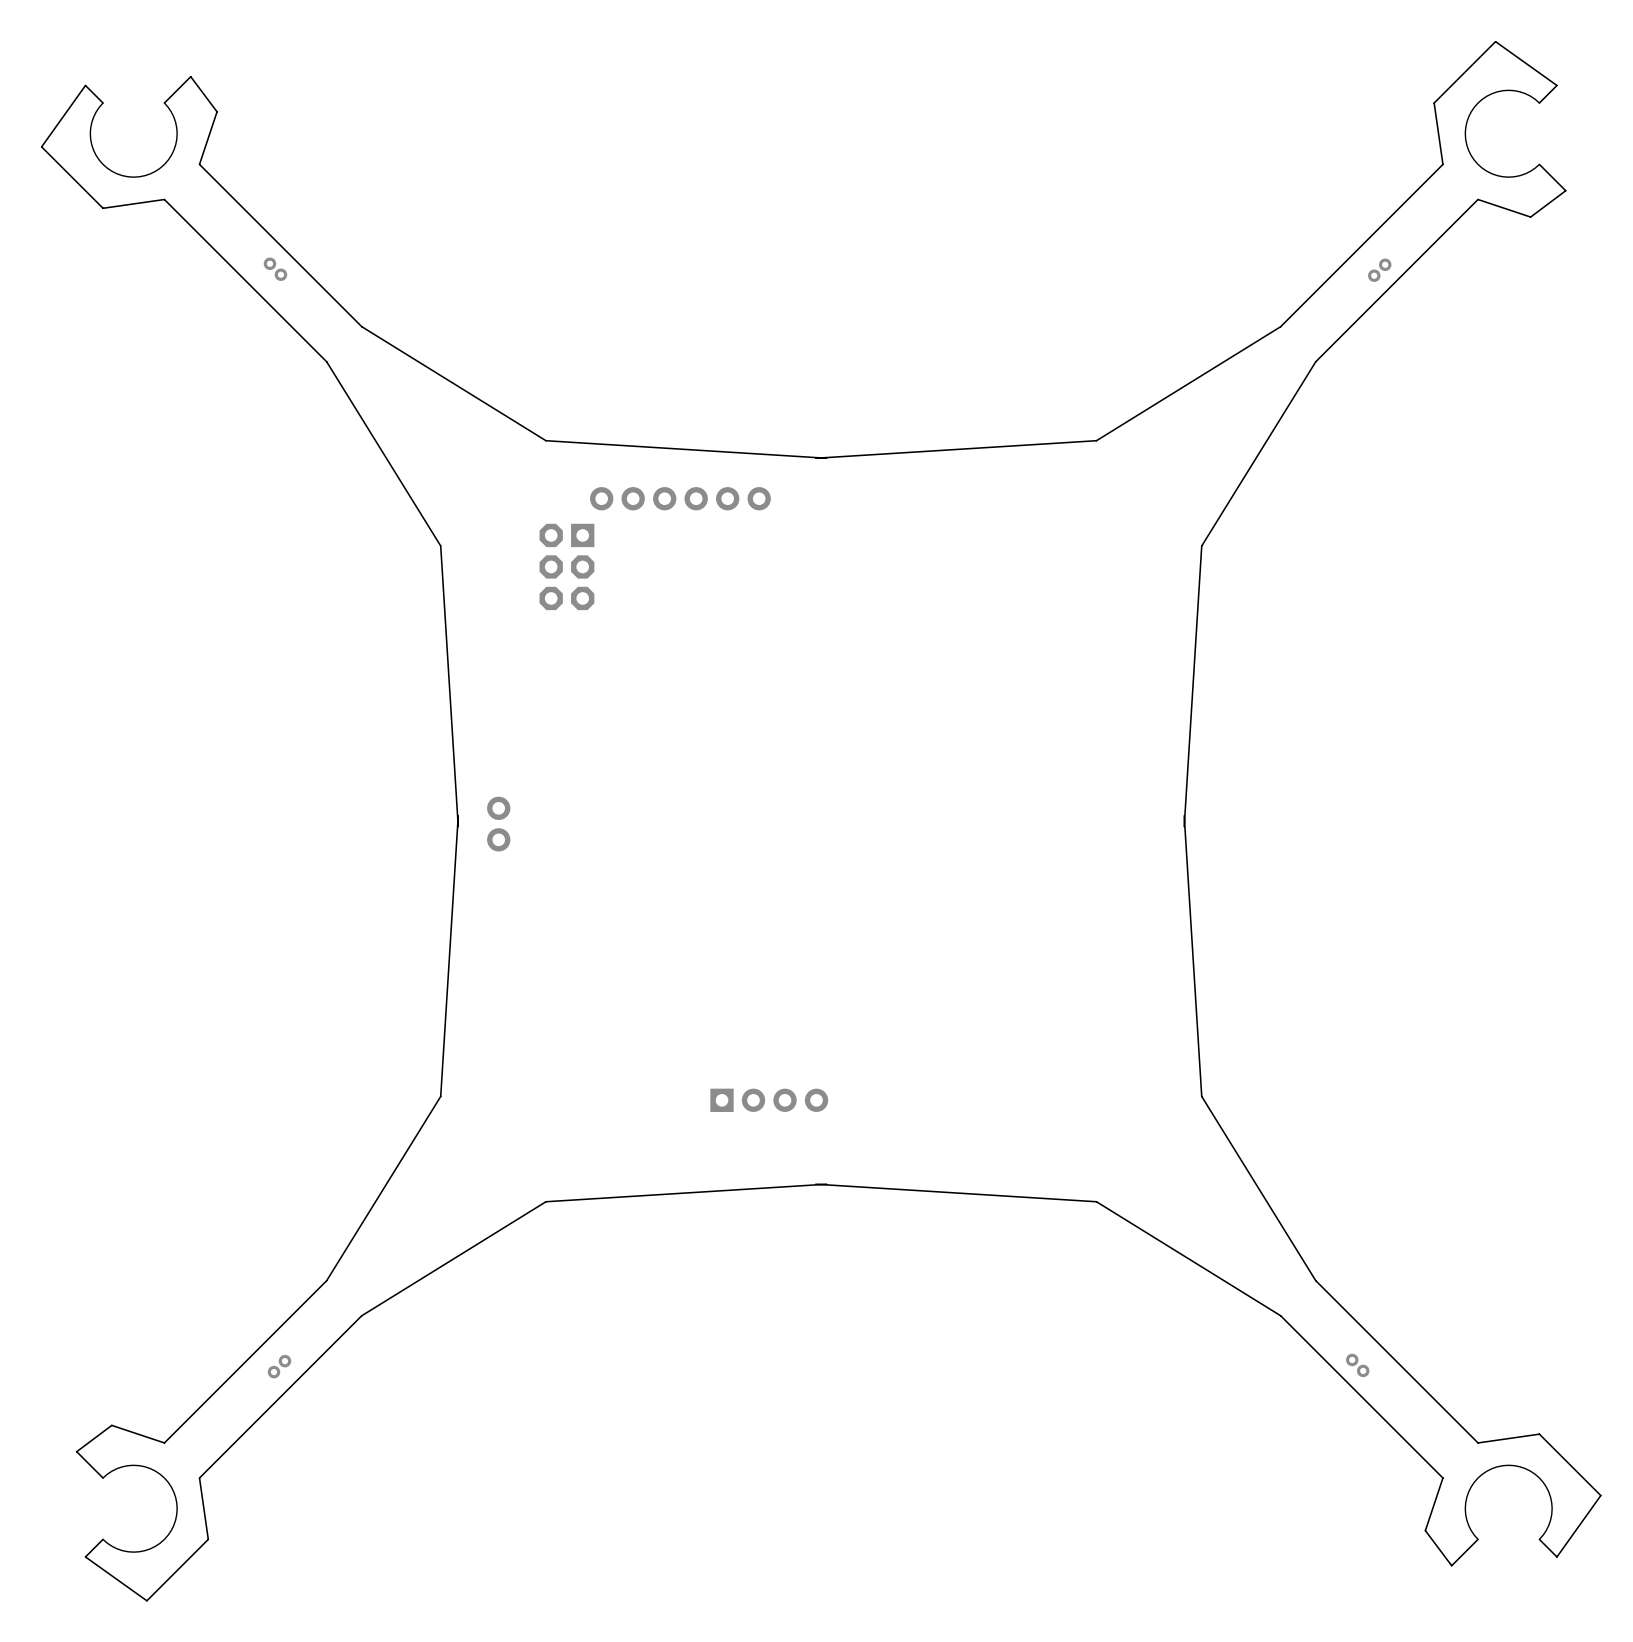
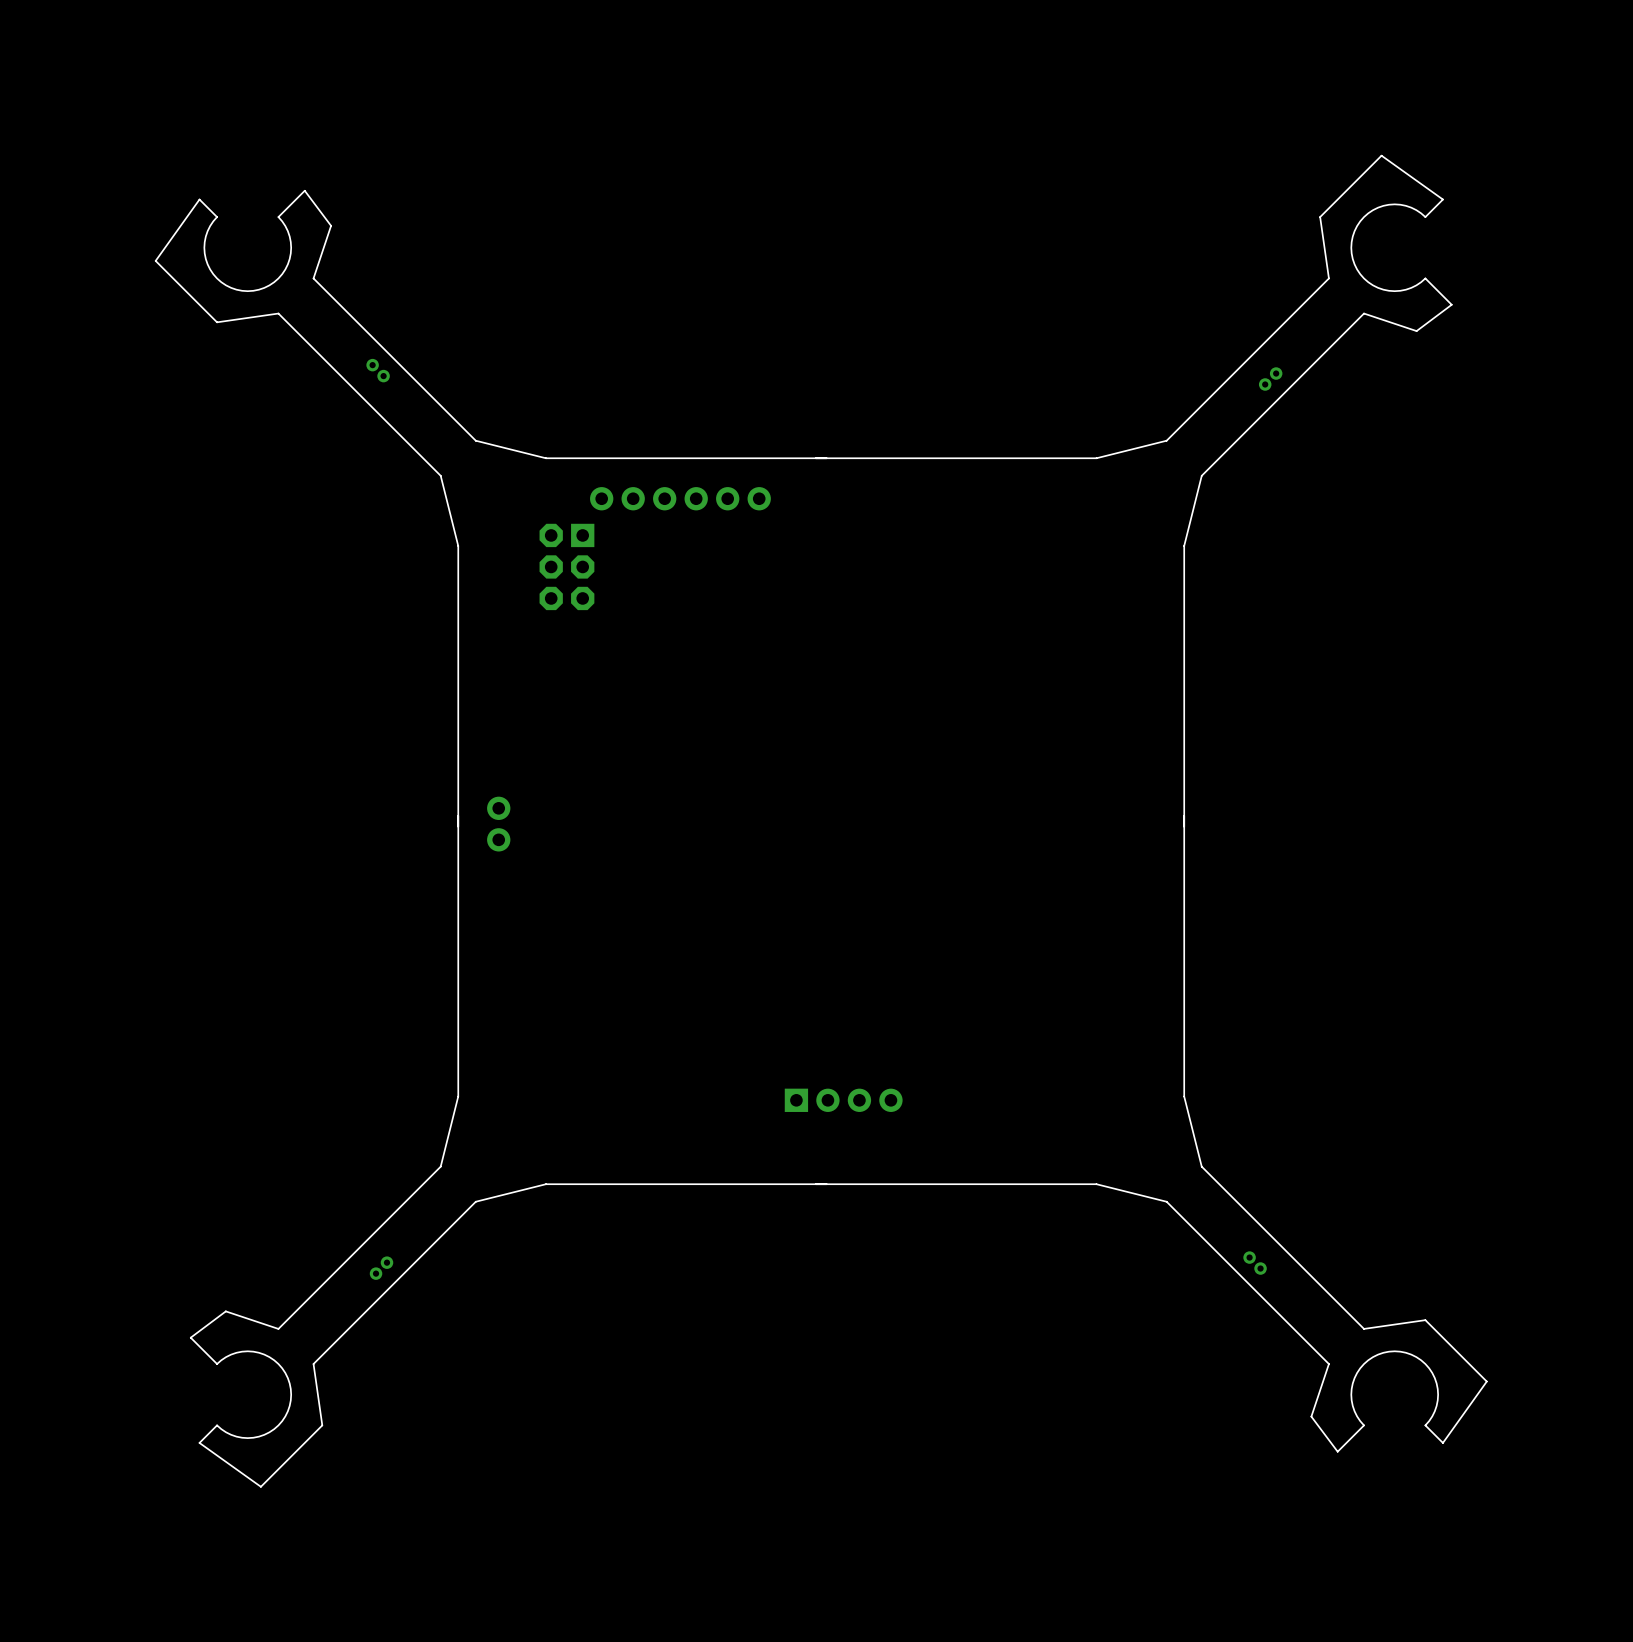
drawing: [40, 40, 1602, 1602] -> none
drawing: none -> [154, 154, 1488, 1488]
part position: (275, 269) -> (378, 370)
part position: (1379, 270) -> (1270, 379)
part position: (769, 1100) -> (843, 1100)
part position: (1357, 1365) -> (1255, 1263)
part position: (279, 1366) -> (381, 1268)

